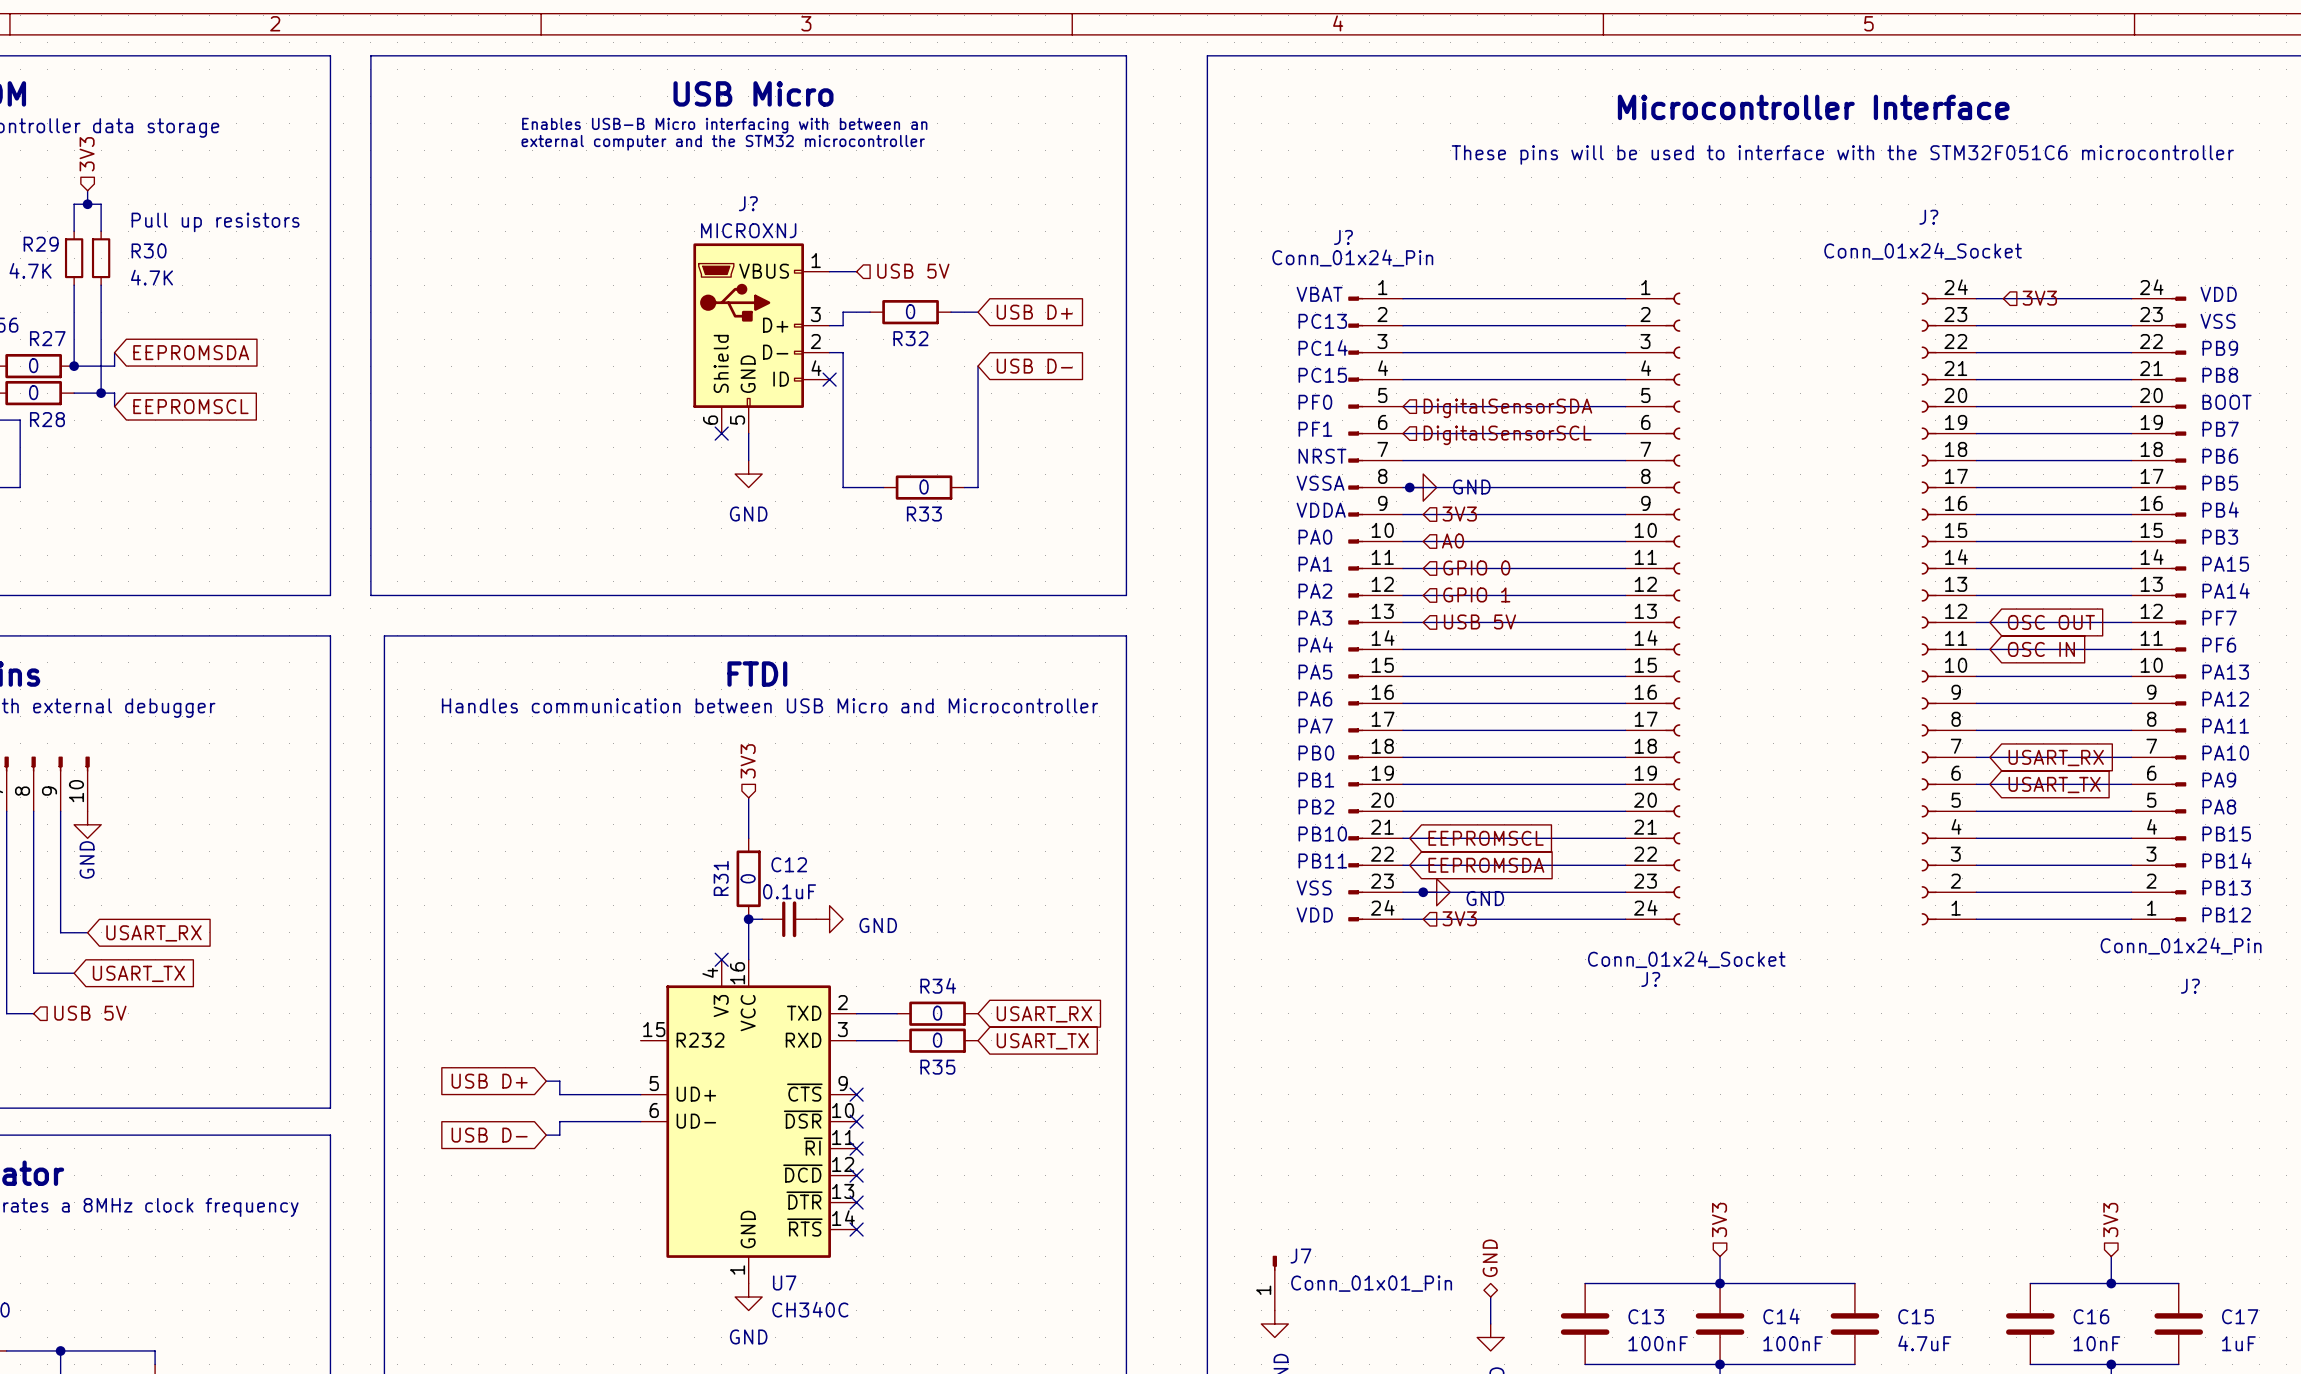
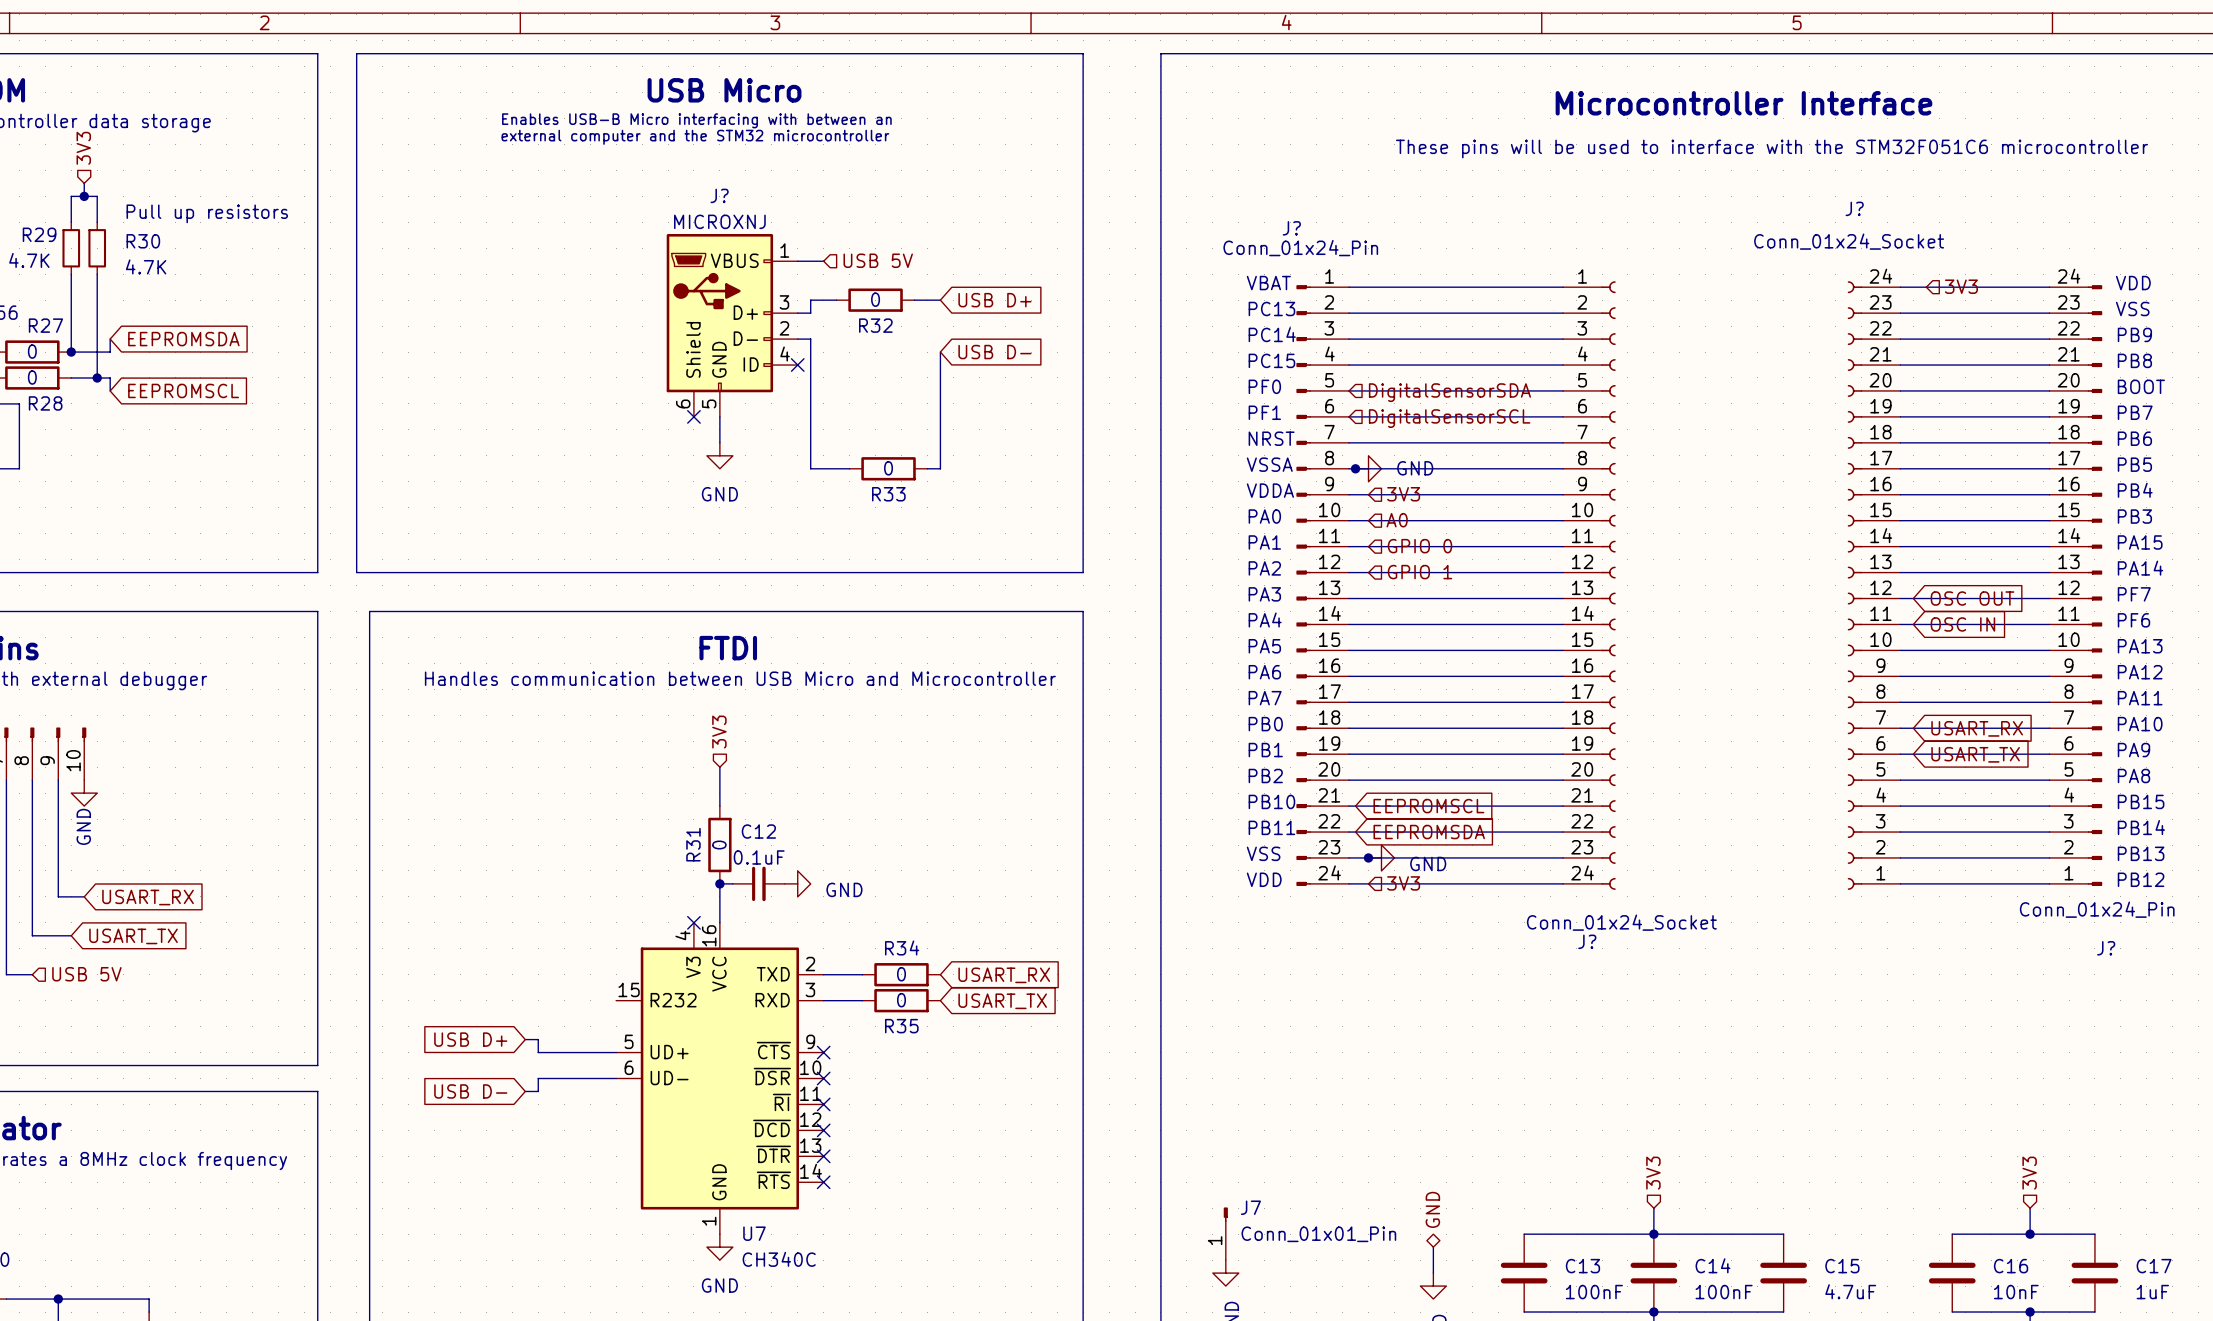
hierarchical label: USB 5V (1479, 621) -> none

